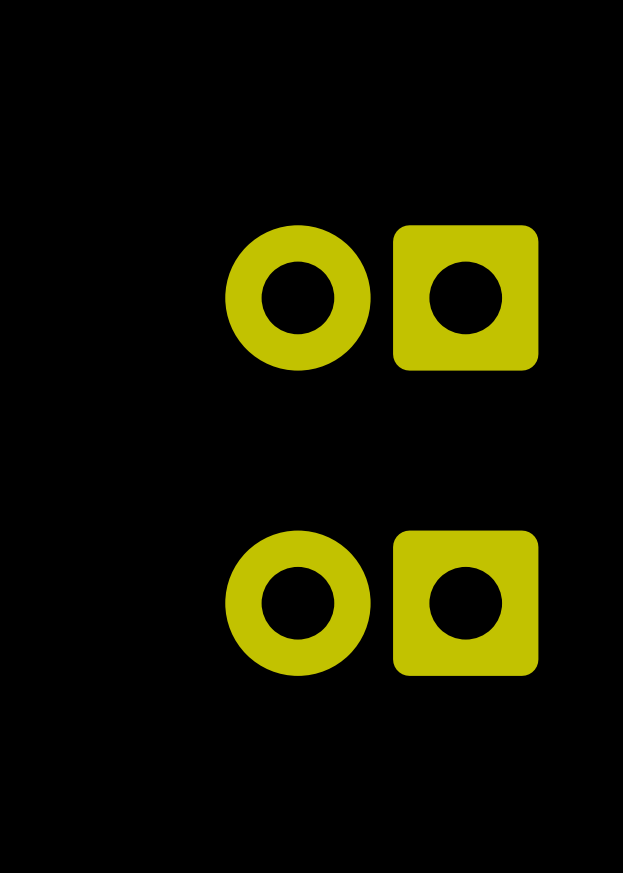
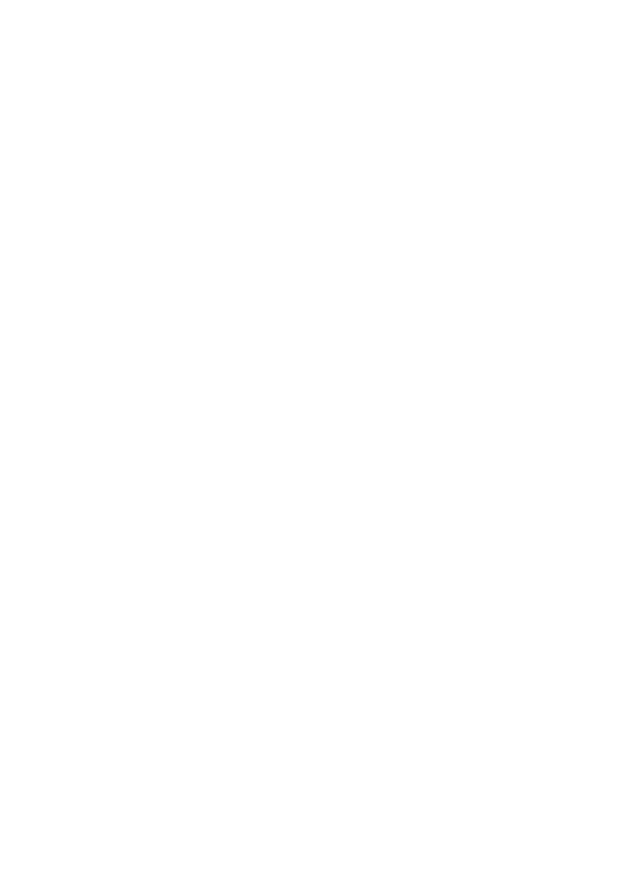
part: (381, 297) -> none
part: (381, 603) -> none

